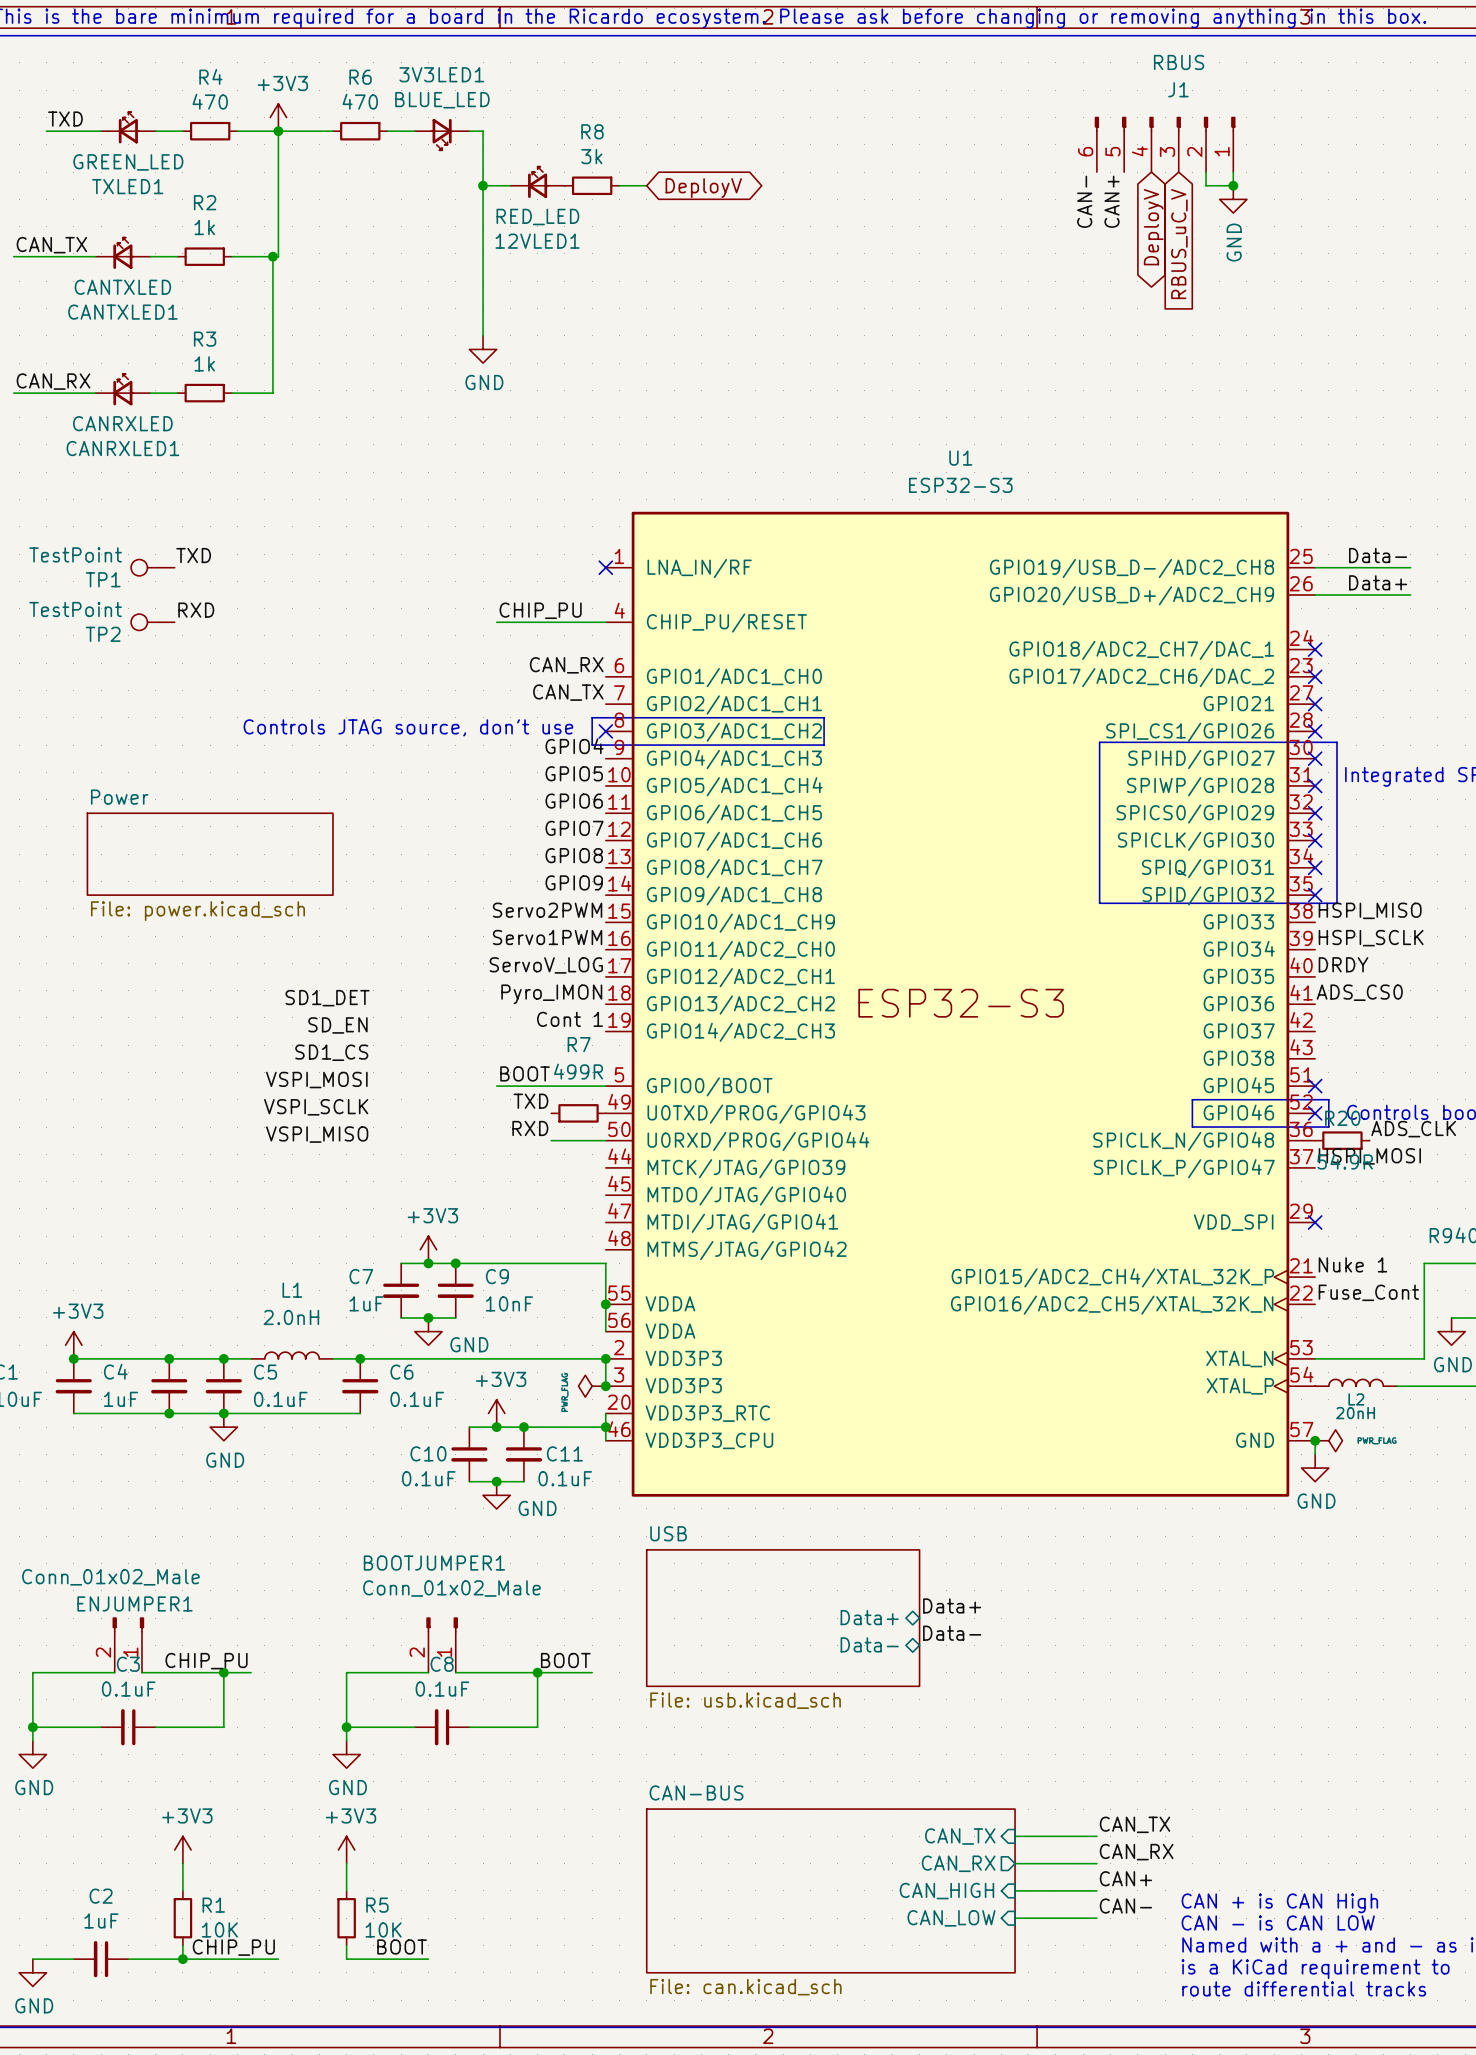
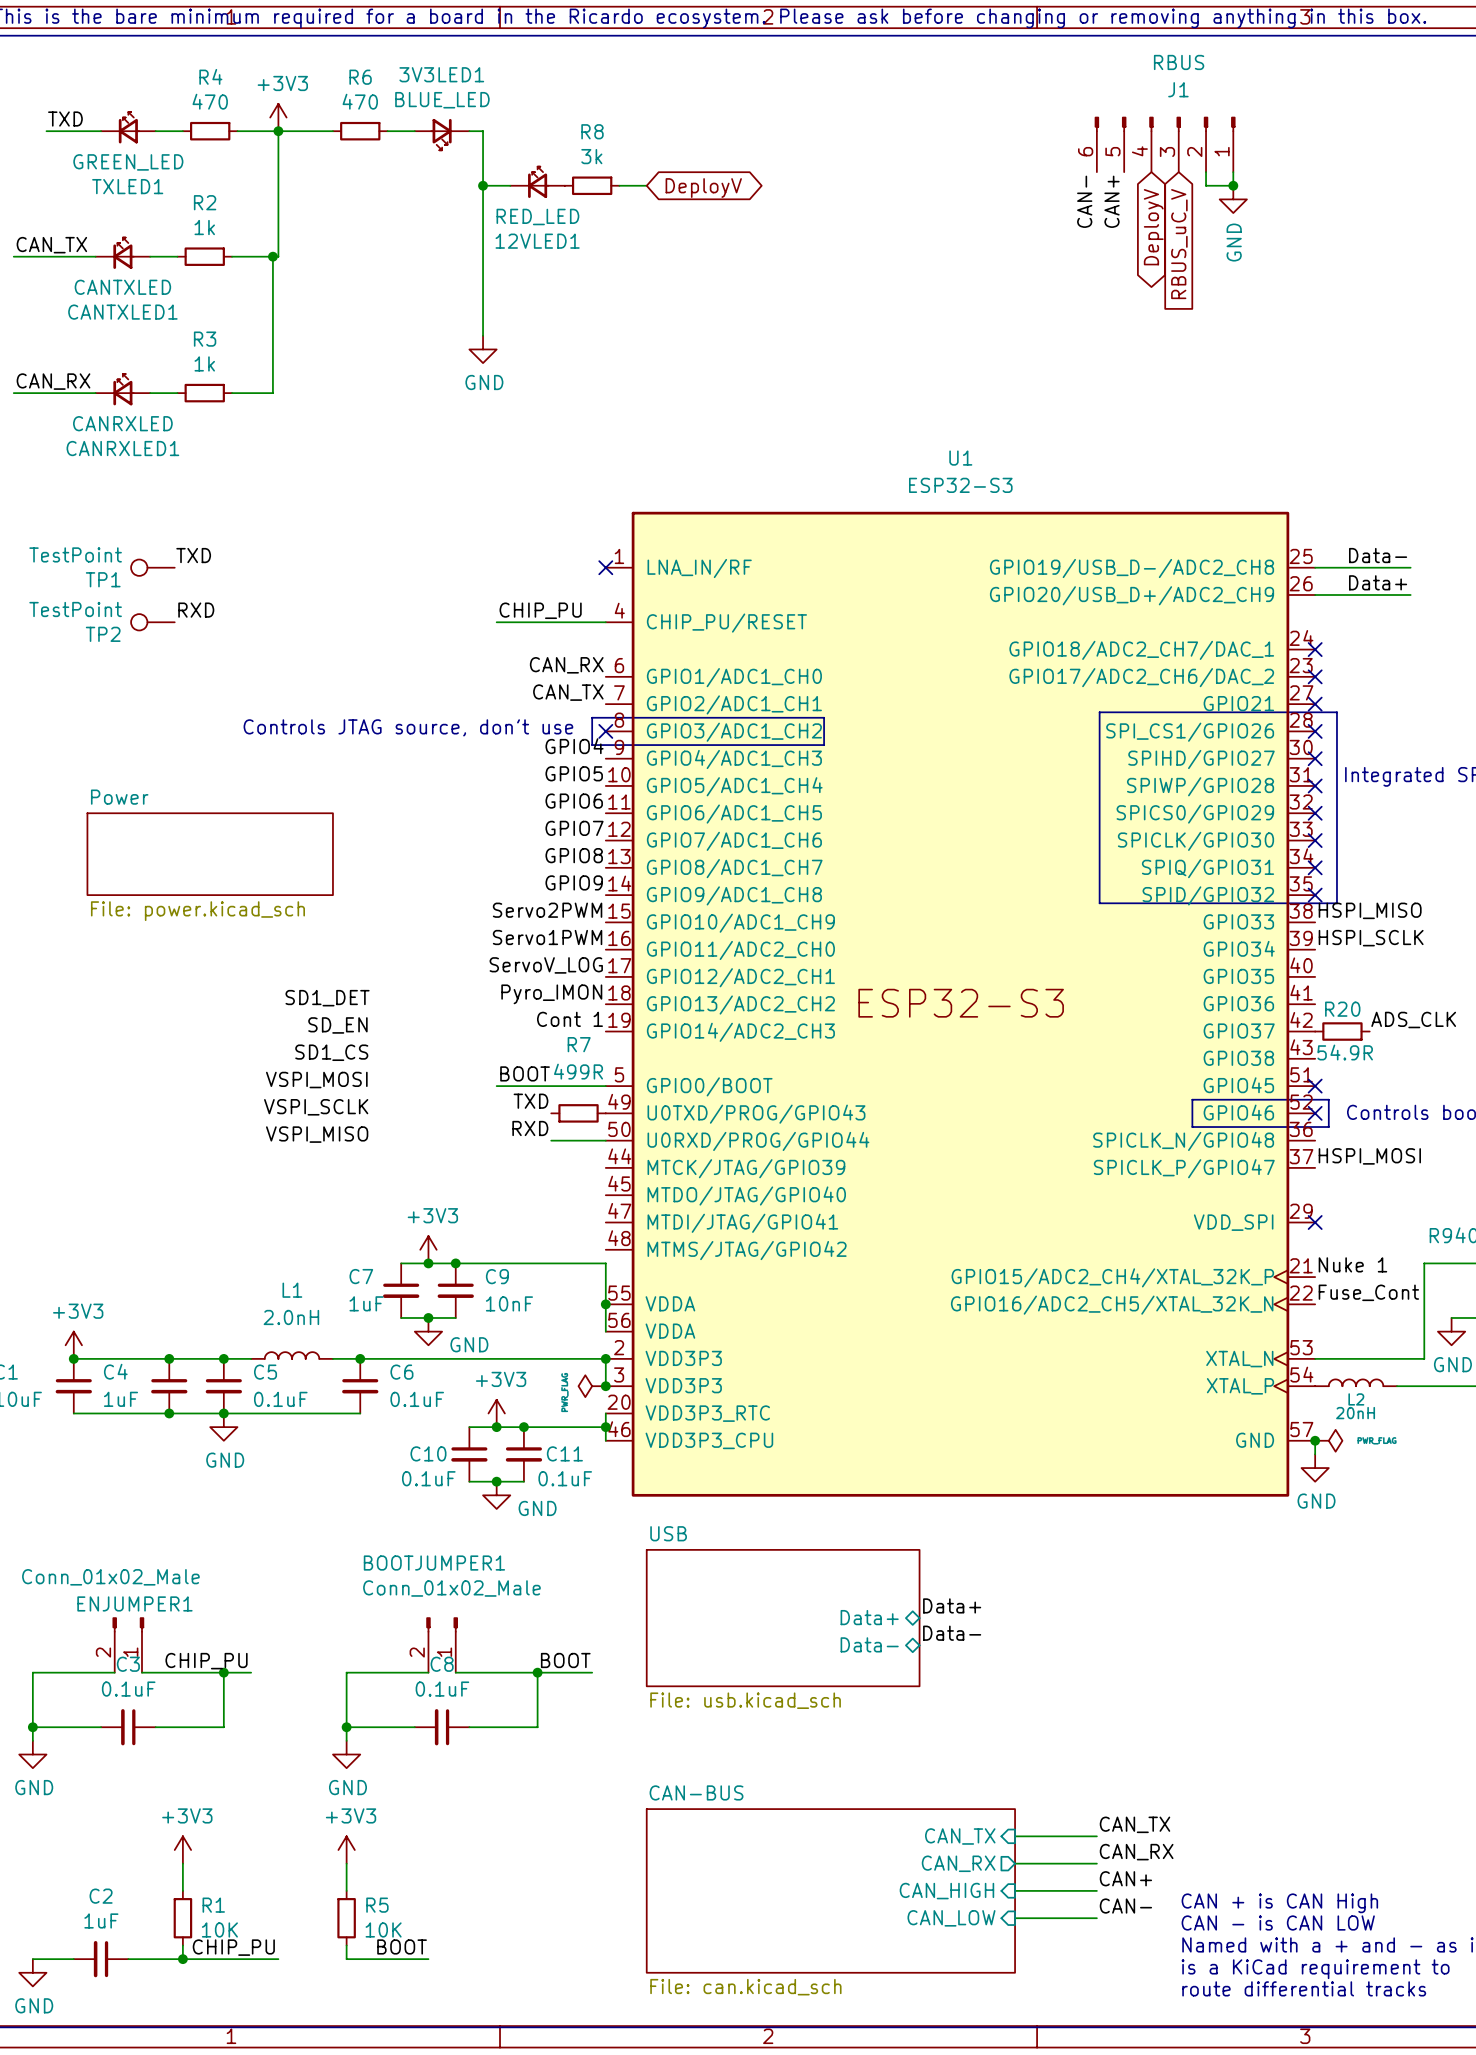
line: (1099, 742) (1336, 742) -> (1099, 742) (1099, 712) (1336, 712) (1336, 742)
label: DRDY (1343, 964) -> none
label: ADS_CS0 (1359, 992) -> none
label position: ADS_CLK (1413, 1129) -> ADS_CLK (1413, 1020)
R20 position: (1342, 1140) -> (1342, 1031)

